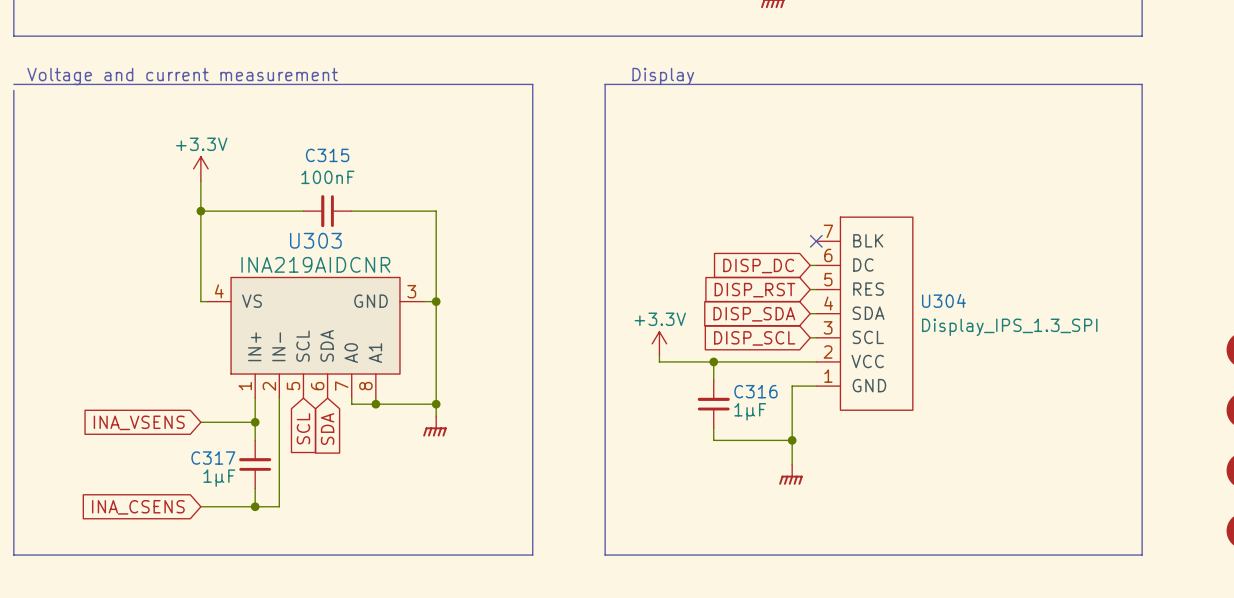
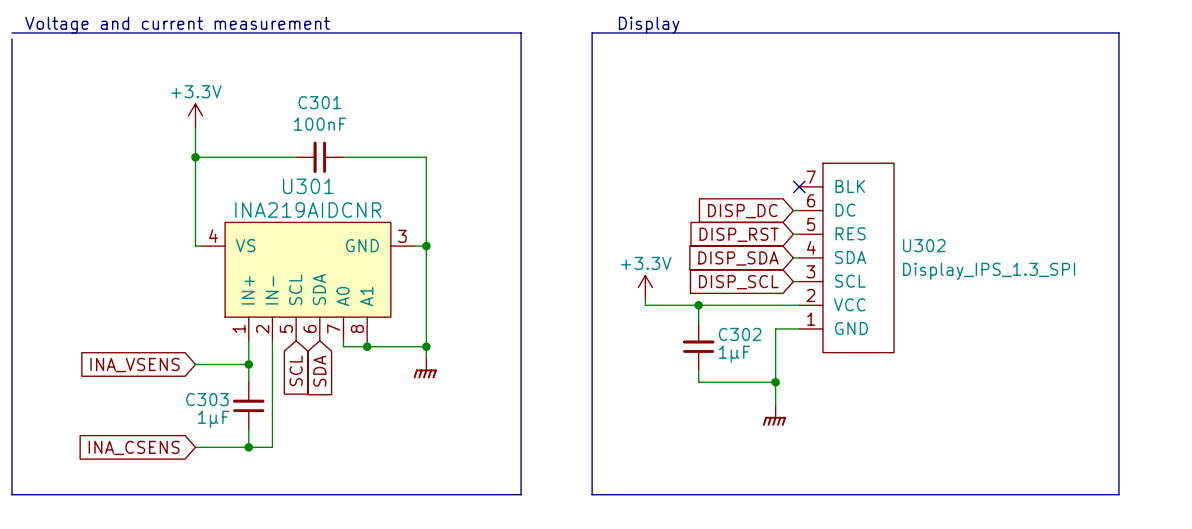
C315 name: C315 (327, 155) -> C301 (319, 102)
U303 name: U303 (315, 240) -> U301 (308, 186)
U304 name: U304 (943, 300) -> U302 (924, 245)
C316 name: C316 (755, 391) -> C302 (740, 334)
C317 name: C317 (213, 458) -> C303 (207, 399)

